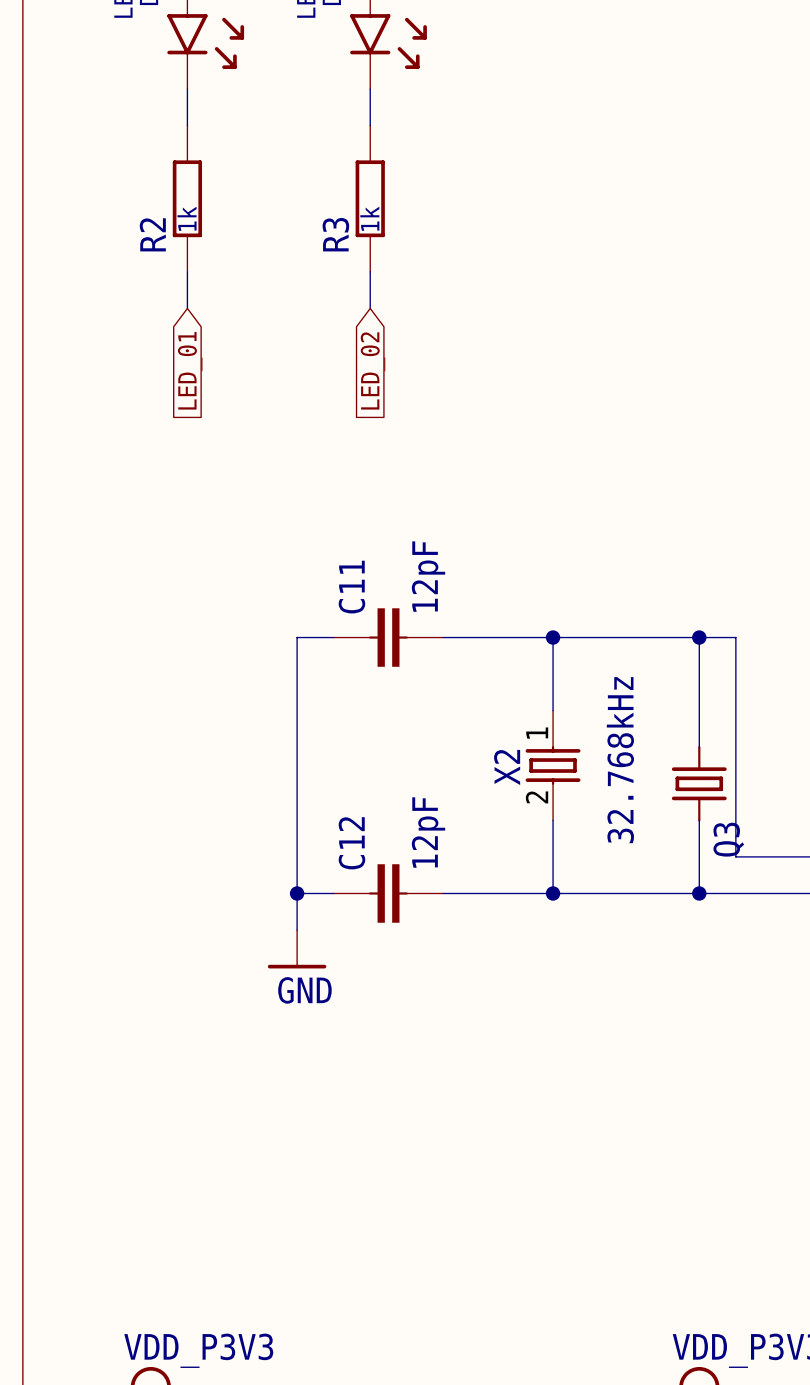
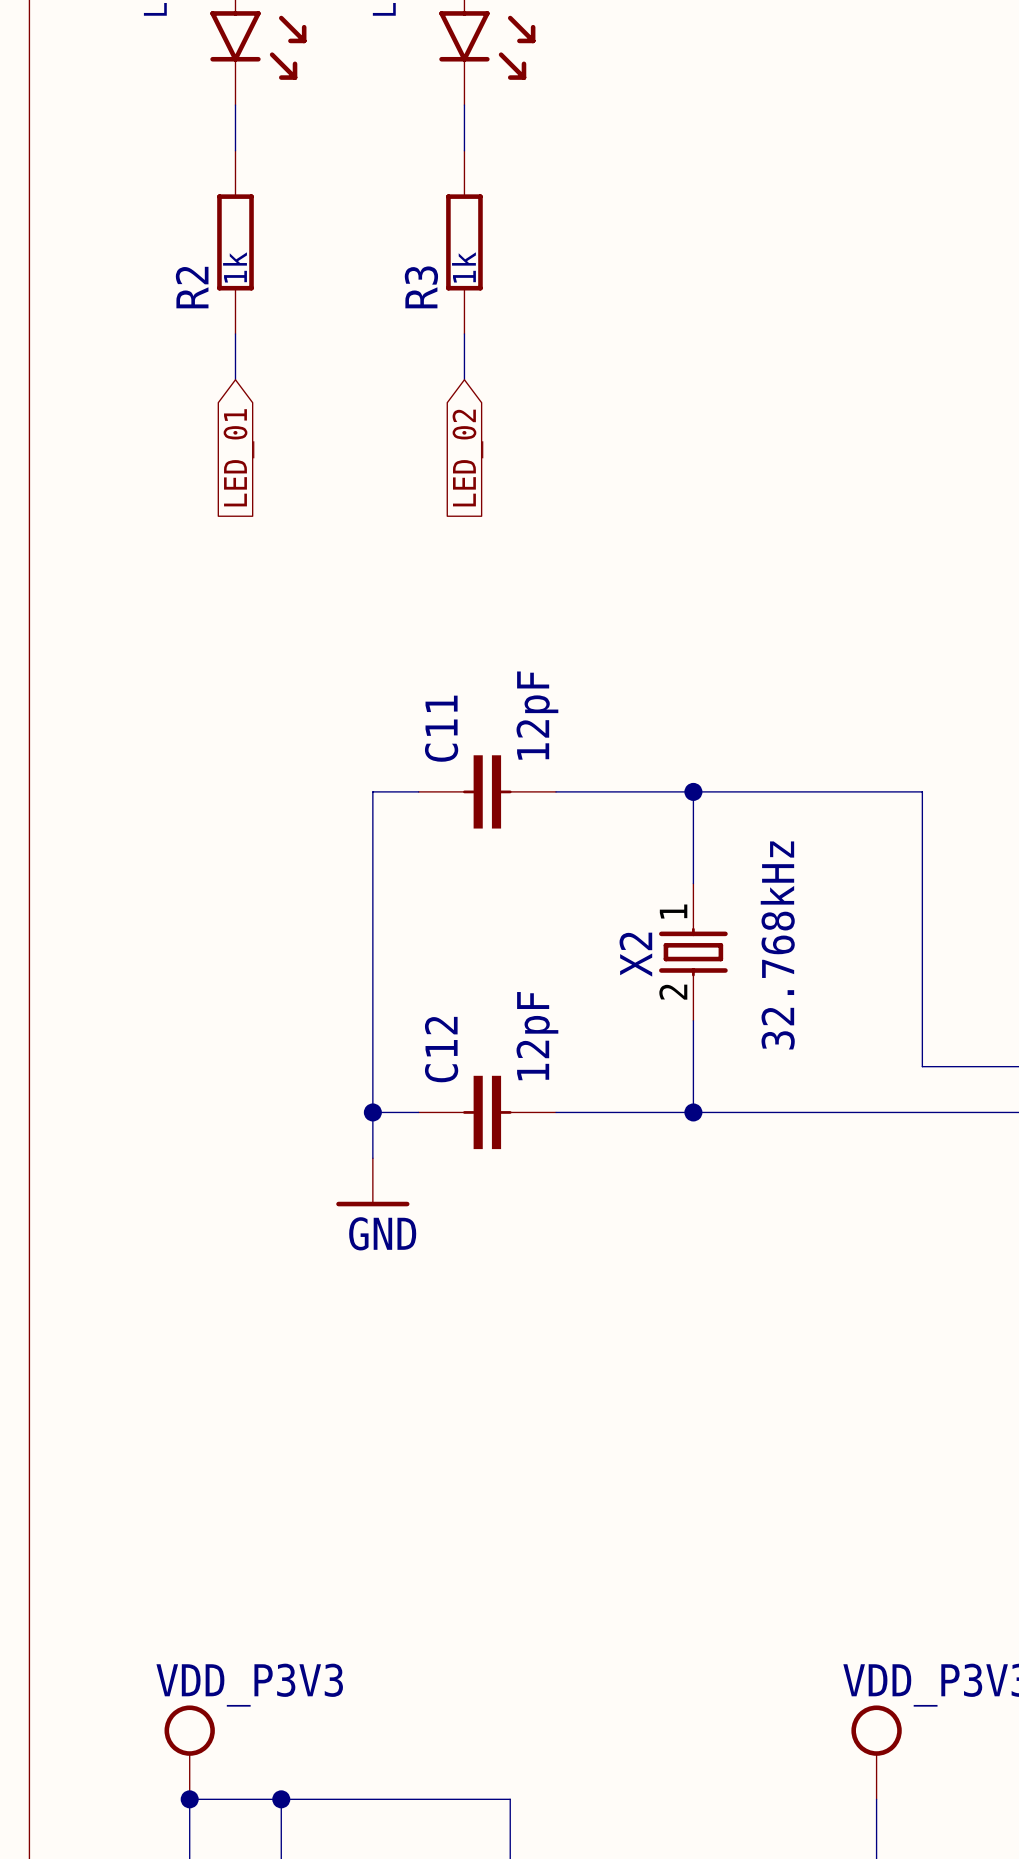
wire: (699, 637) (699, 747) -> none
junction: (699, 637) -> none
Q3: (699, 783) -> none
wire: (699, 820) (699, 893) -> none
junction: (699, 893) -> none

